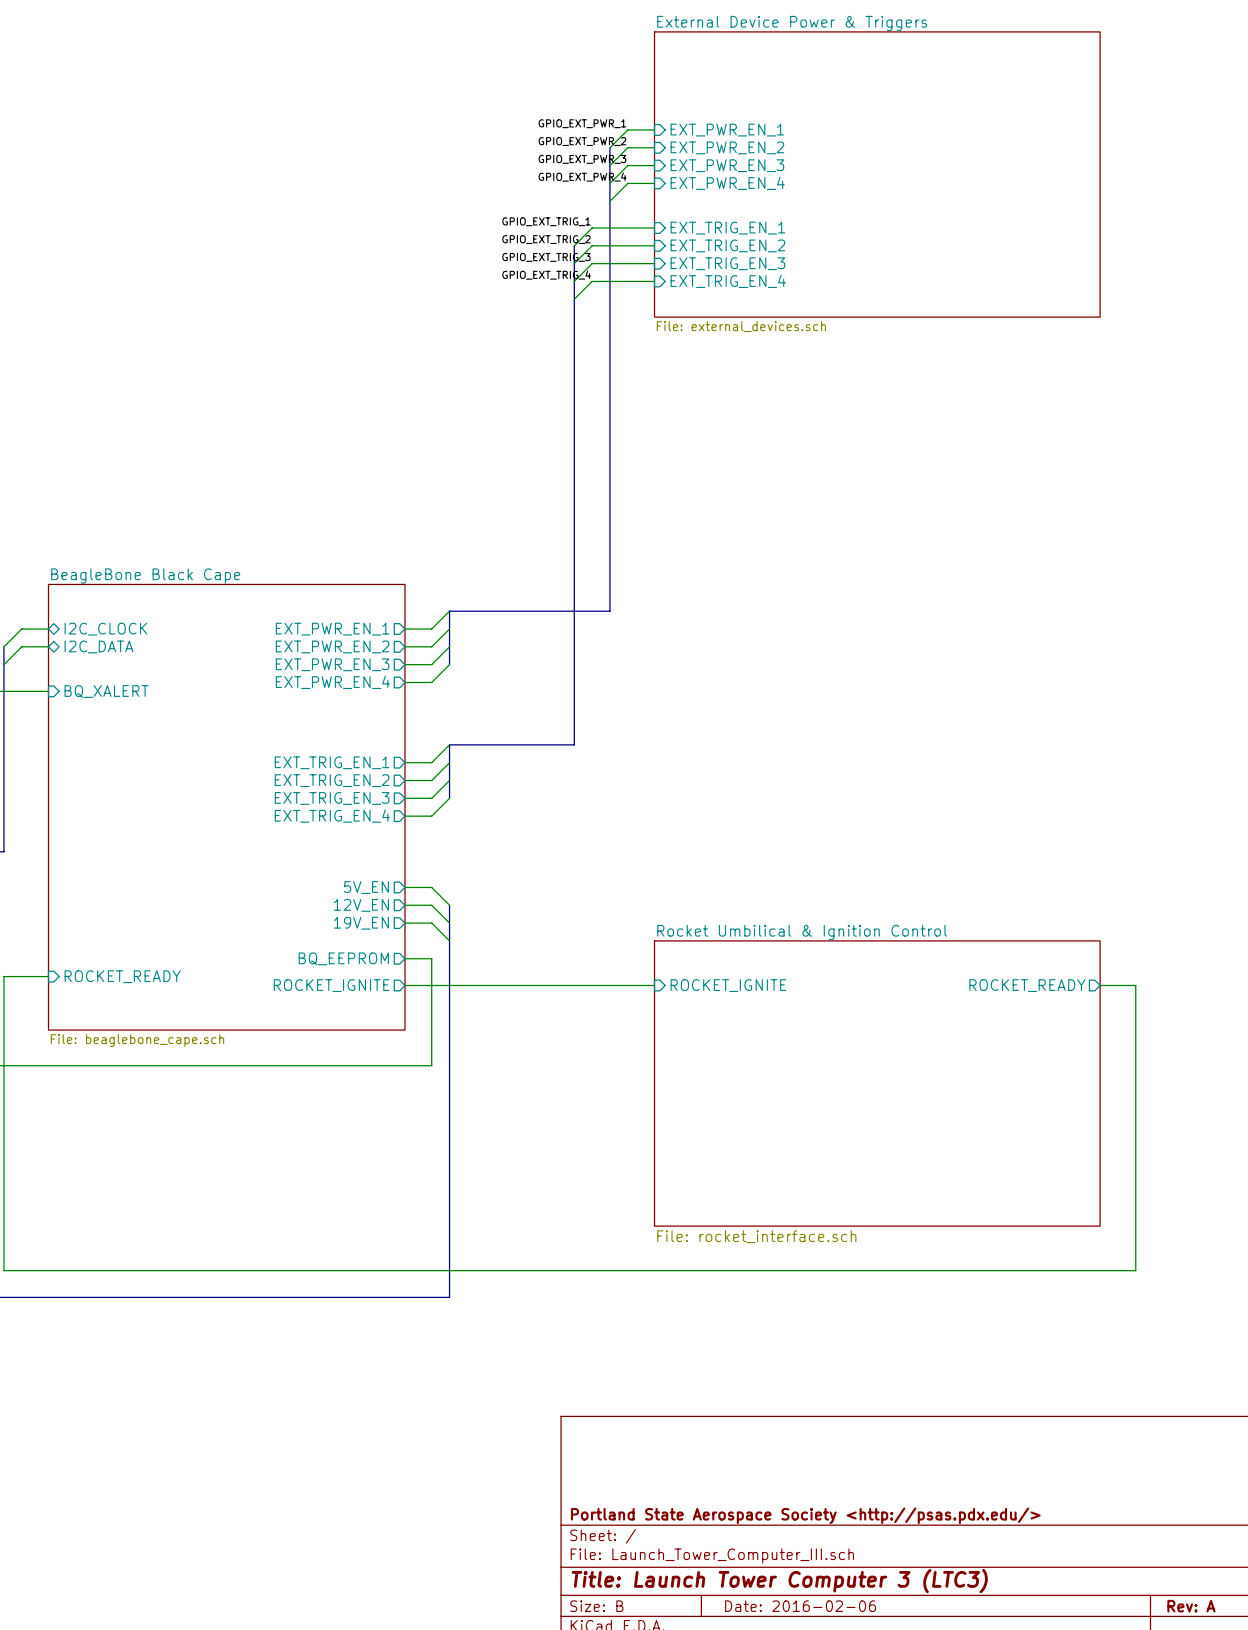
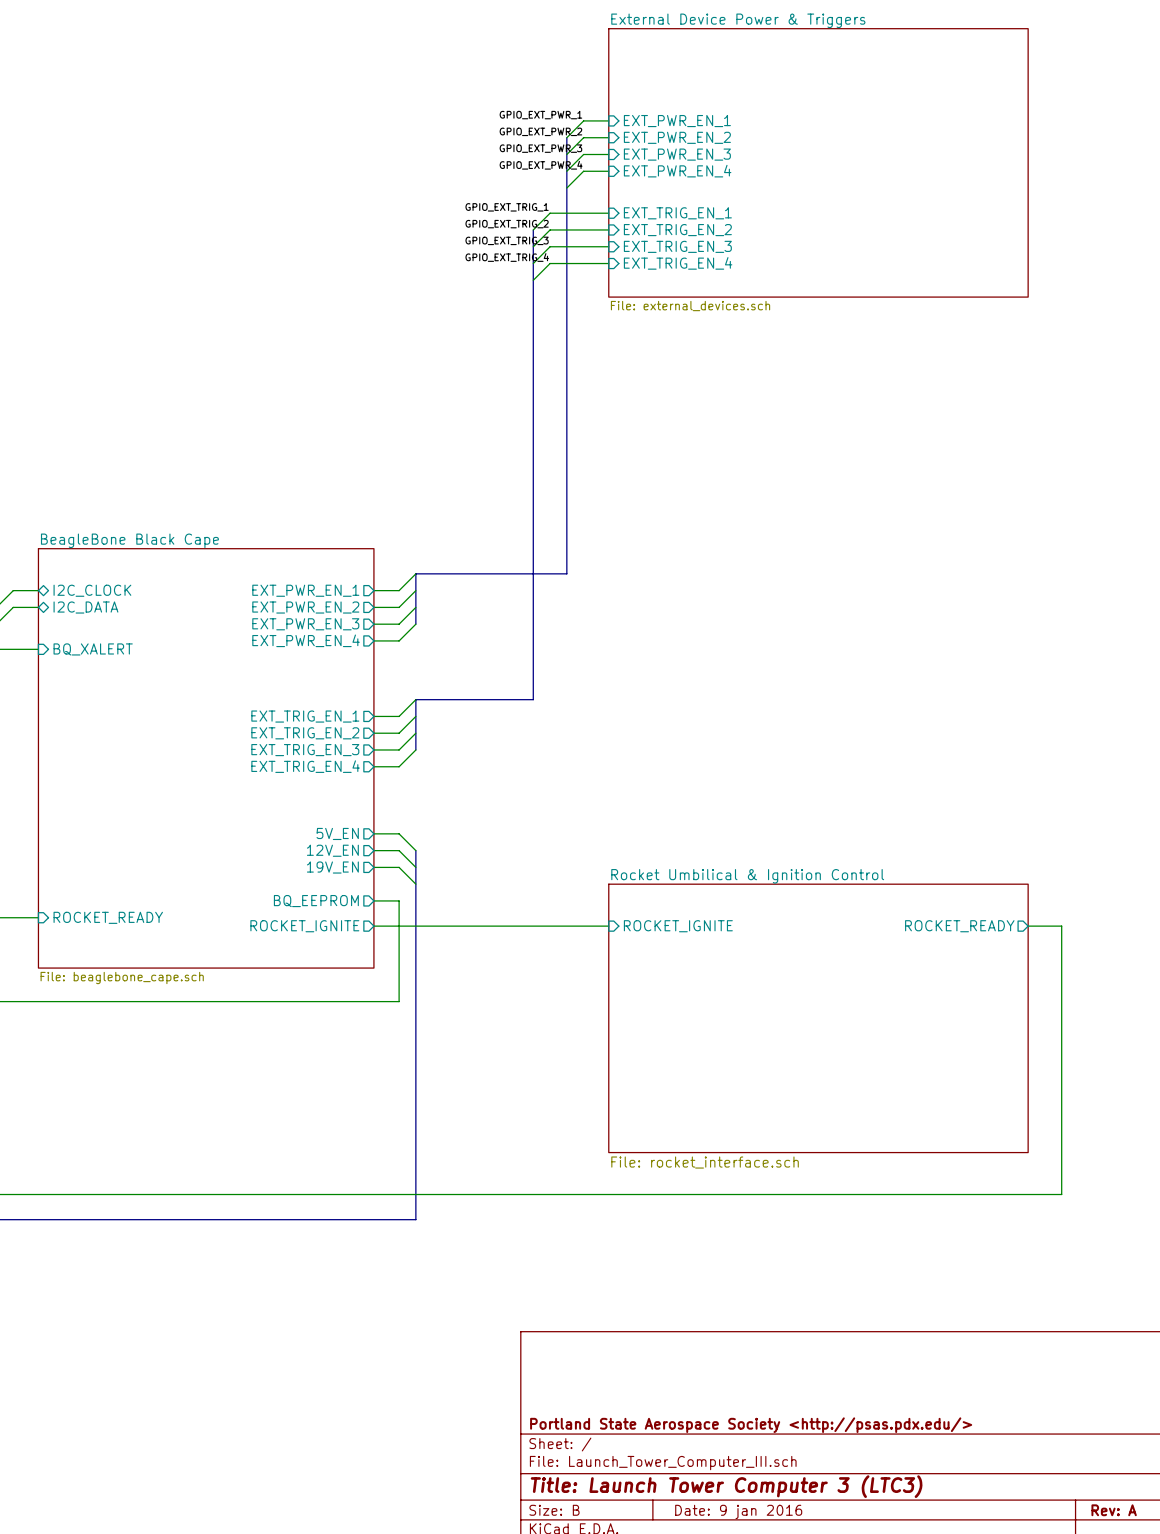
title block: Date: 2016-02-06 (800, 1606) -> Date: 9 jan 2016 (738, 1511)

